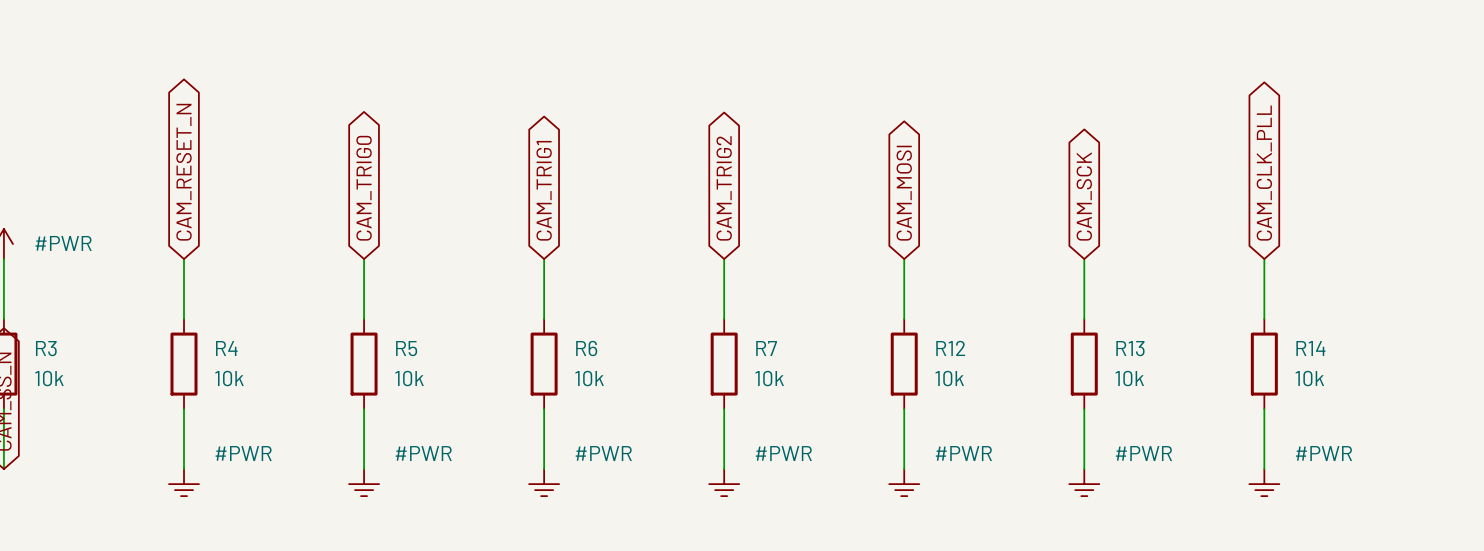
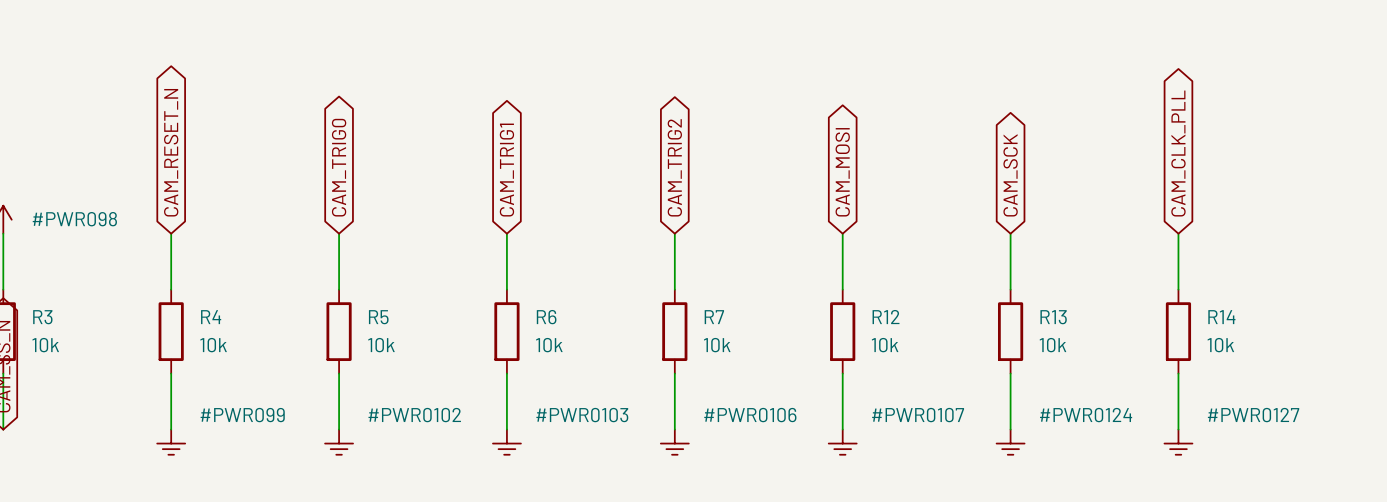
#PWR name: #PWR (63, 243) -> #PWR098 (74, 219)
#PWR name: #PWR (243, 453) -> #PWR099 (242, 415)
#PWR name: #PWR (423, 453) -> #PWR0102 (414, 415)
#PWR name: #PWR (603, 453) -> #PWR0103 (582, 415)
#PWR name: #PWR (783, 453) -> #PWR0106 (750, 415)
#PWR name: #PWR (963, 453) -> #PWR0107 (918, 415)
#PWR name: #PWR (1143, 453) -> #PWR0124 (1086, 415)
#PWR name: #PWR (1323, 453) -> #PWR0127 (1253, 415)

